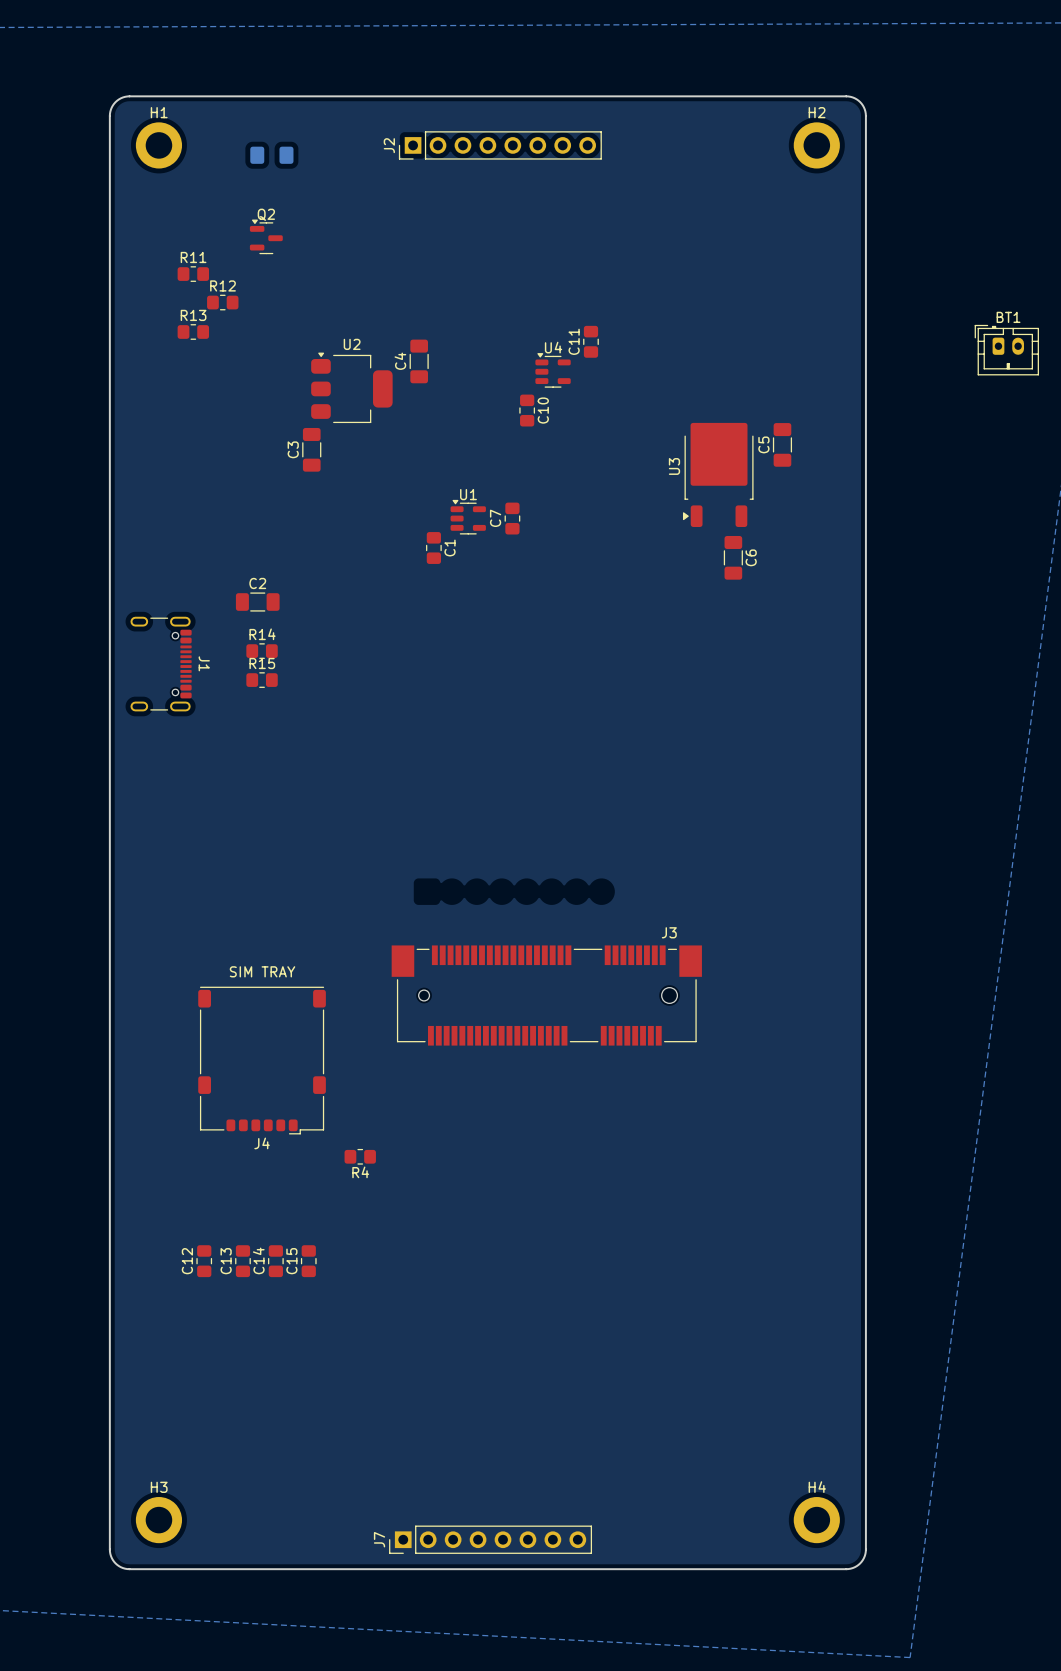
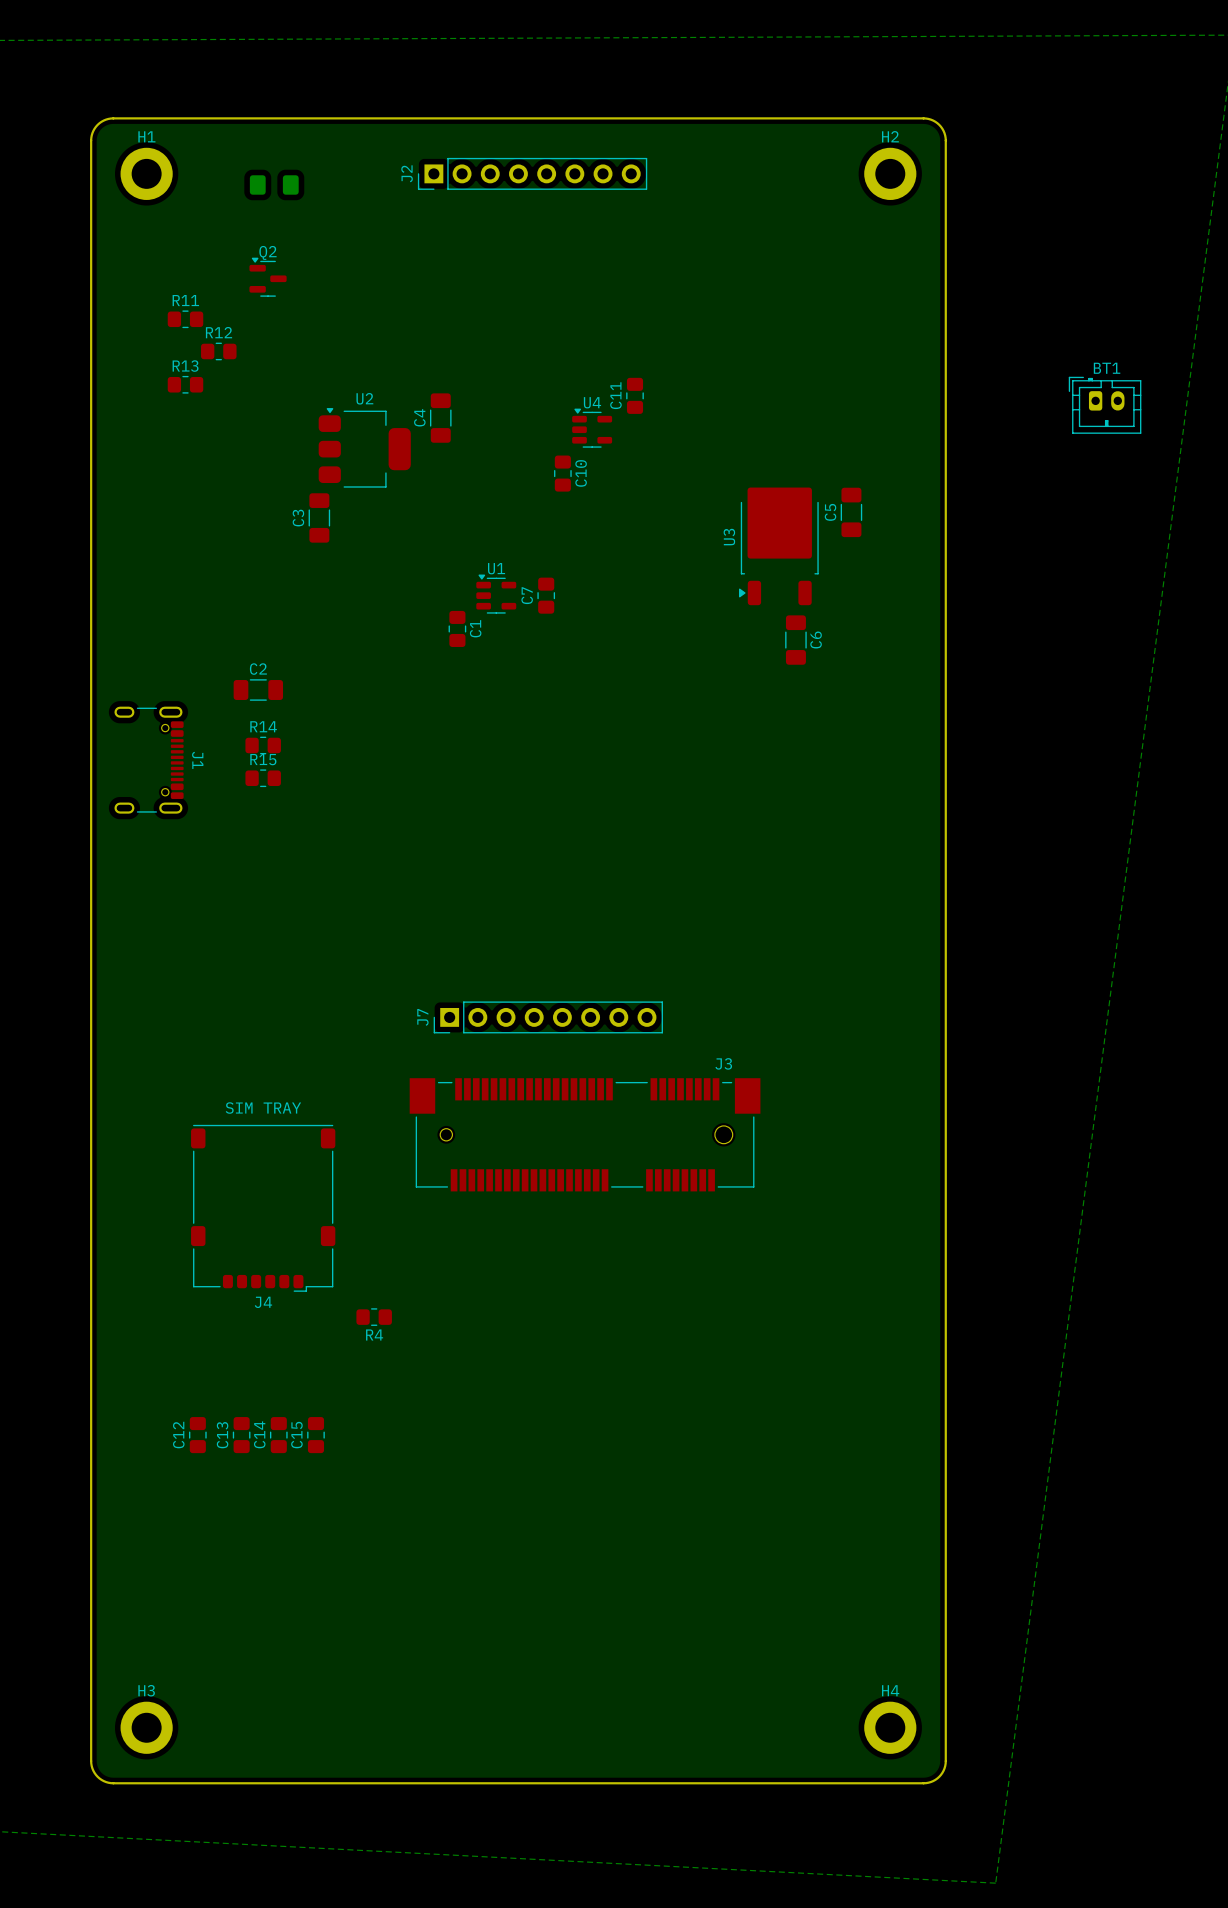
J7 position: (490, 1539) -> (548, 1017)

